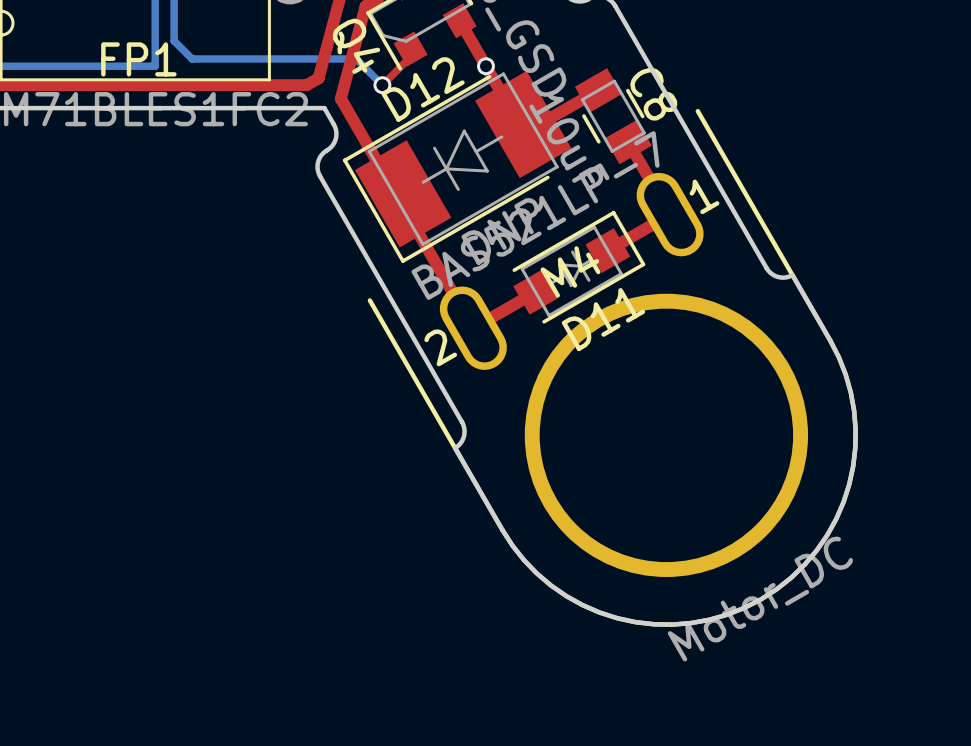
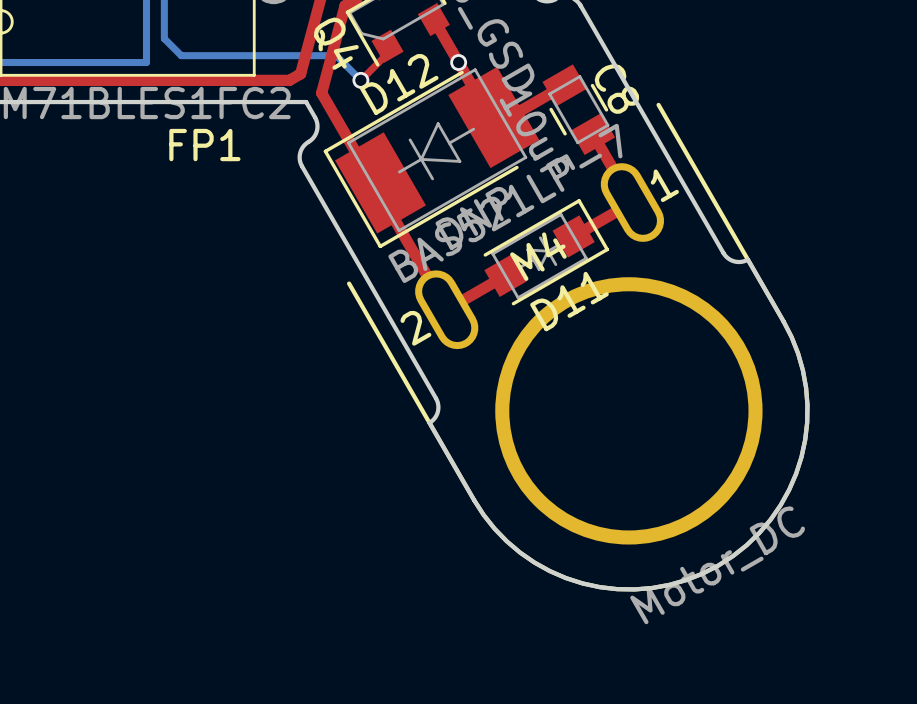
FP1 name position: FP1 (138, 59) -> FP1 (204, 145)

